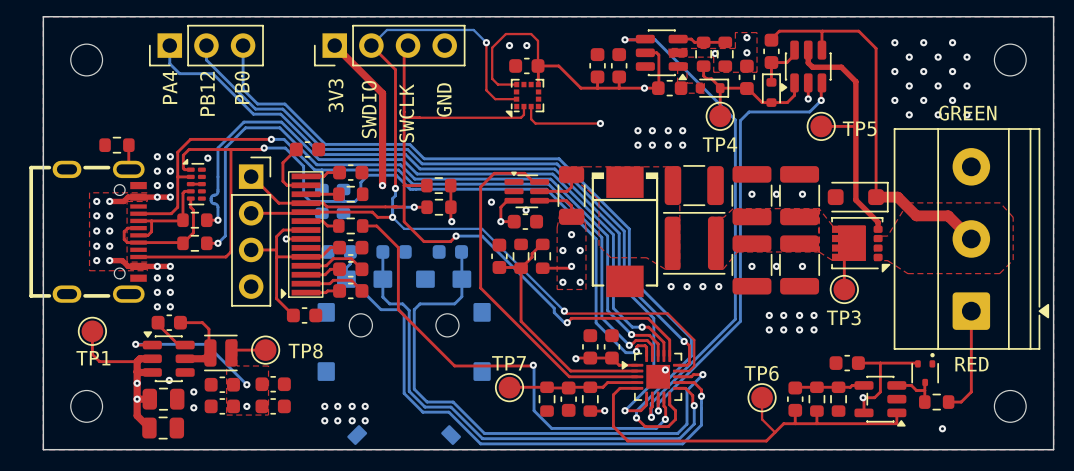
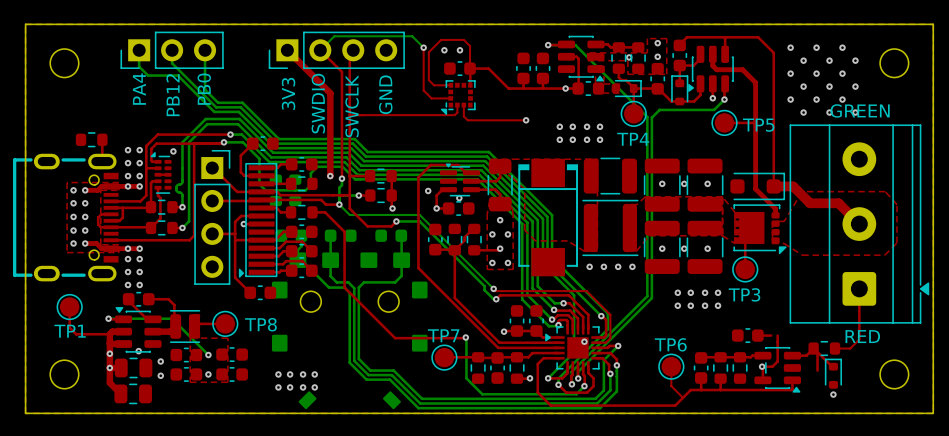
part footprint: [911, 352, 940, 387] -> [808, 340, 841, 357]
top track: (917, 362) (873, 363) -> none
top track: (971, 367) (971, 391) (961, 402) (948, 402) -> (859, 339) (850, 348) (835, 348)
top track: (911, 385) (916, 390) (924, 390) -> (805, 355) (813, 348) (833, 366)
part footprint: [919, 393, 955, 411] -> [824, 358, 842, 389]

